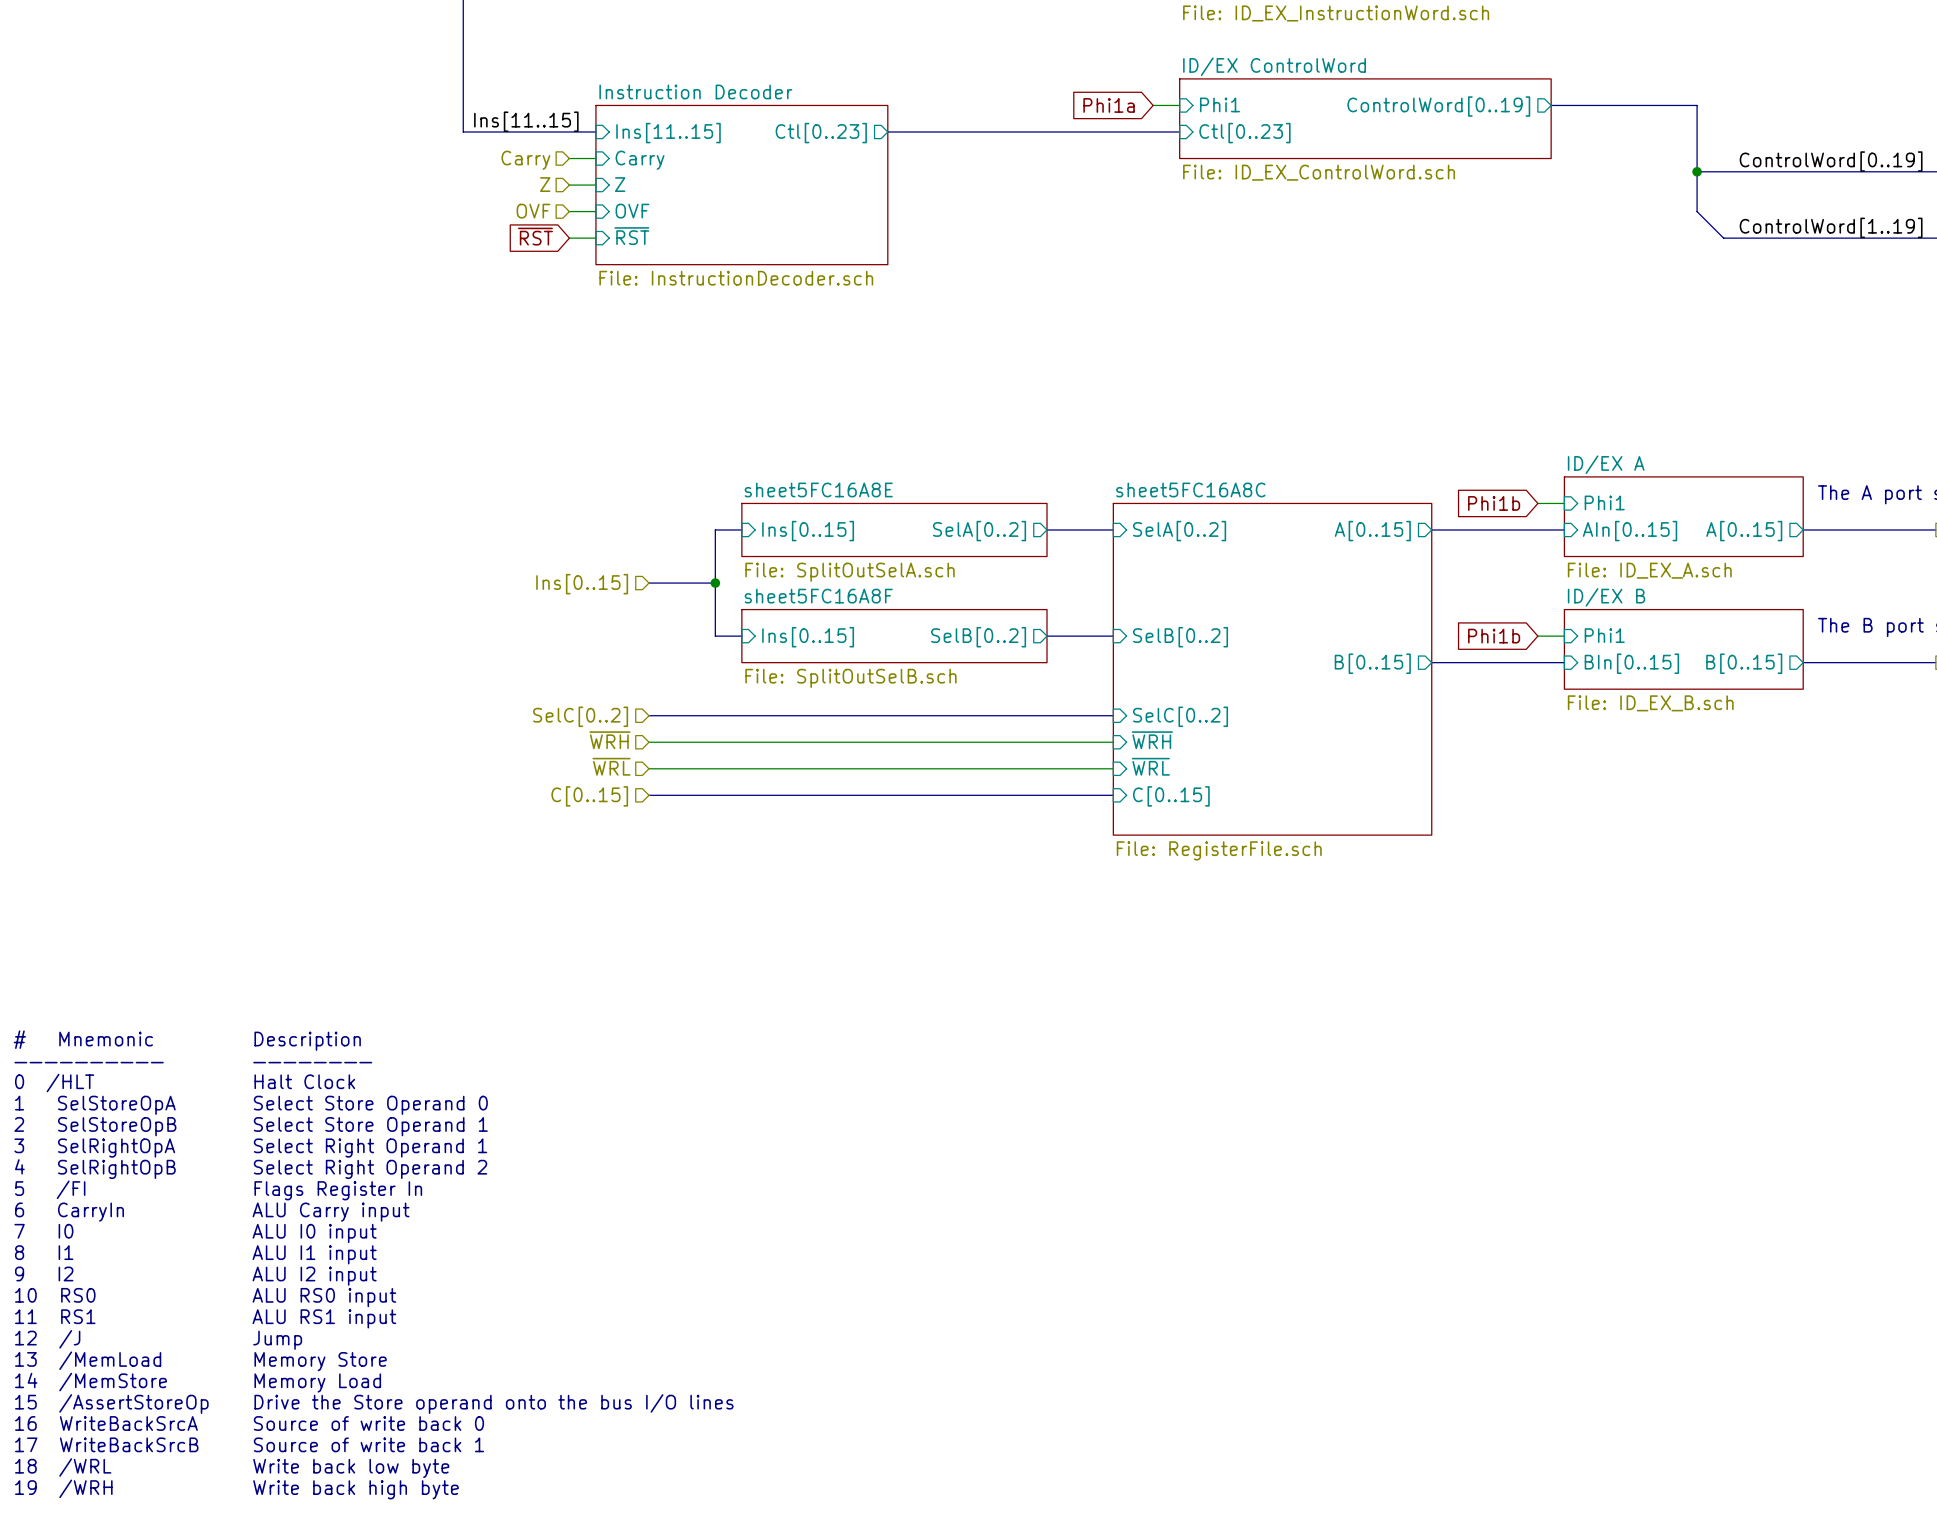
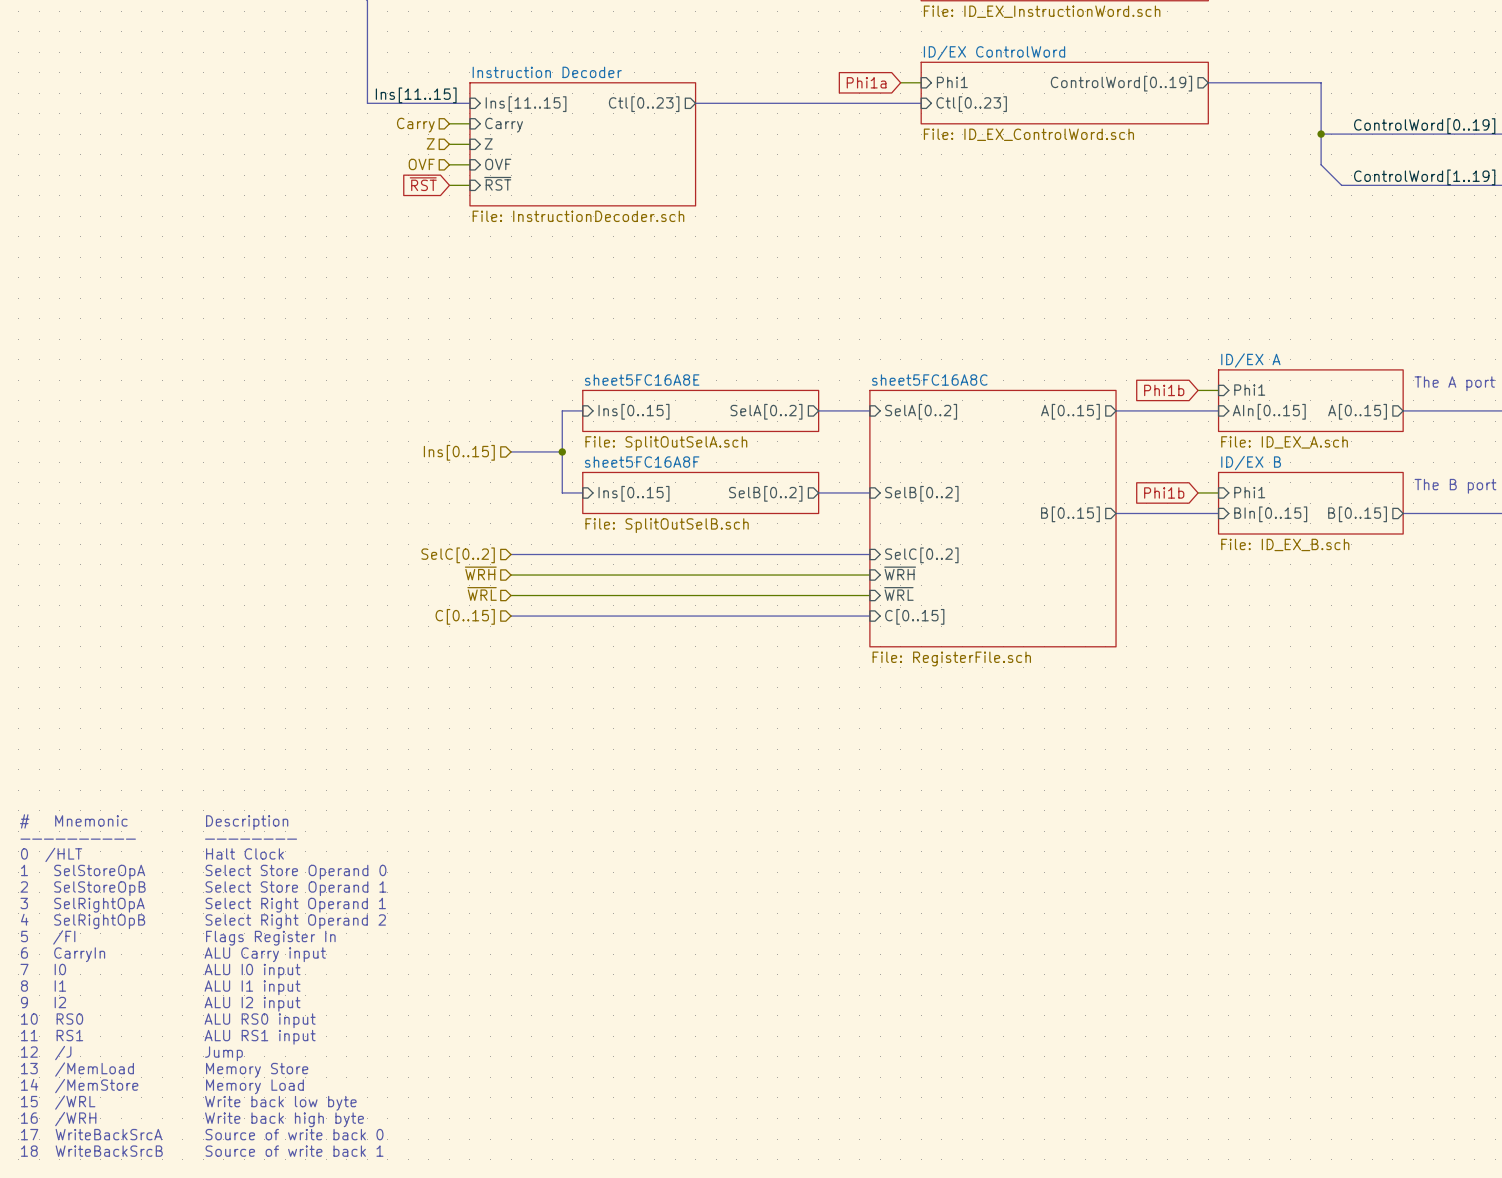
text: # Mnemonic (83, 1039) -> none
text: Description (307, 1041) -> none
text: —————————— (89, 1062) -> # Mnemonic (73, 821)
text: ———————— (312, 1062) -> Description (247, 822)
text: Halt Clock (304, 1081) -> ———————— (251, 839)
text: 0 /HLT (54, 1083) -> —————————— (78, 839)
text: 1 SelStoreOpA (95, 1105) -> 0 /HLT (51, 854)
text: Select Store Operand 0 (370, 1105) -> Halt Clock (244, 853)
text: 2 SelStoreOpB (95, 1126) -> 1 SelStoreOpA (83, 872)
text: Select Store Operand 1 (370, 1126) -> Select Store Operand 0 (295, 872)
text: 3 SelRightOpA (94, 1148) -> 2 SelStoreOpB (83, 888)
text: Select Right Operand 1 (370, 1148) -> Select Store Operand 1 (295, 888)
text: 4 SelRightOpB (95, 1169) -> 3 SelRightOpA (82, 905)
text: Select Right Operand 2 (370, 1169) -> Select Right Operand 1 (295, 905)
text: 5 /FI (50, 1189) -> 4 SelRightOpB (83, 921)
text: Flags Register In (338, 1190) -> Select Right Operand 2 (295, 921)
text: 6 CarryIn (69, 1212) -> 5 /FI (48, 937)
text: ALU Carry input (331, 1212) -> Flags Register In (270, 938)
text: 7 I0 (43, 1231) -> 6 CarryIn (63, 954)
text: ALU I0 input (314, 1233) -> ALU Carry input (265, 954)
text: 8 I1 (44, 1252) -> 7 I0 (43, 969)
text: ALU I1 input (314, 1254) -> ALU I0 input (252, 971)
text: 9 I2 (44, 1273) -> 8 I1 (43, 986)
text: ALU I2 input (314, 1276) -> ALU I1 input (252, 987)
text: 10 RS0 (55, 1295) -> 9 I2 (43, 1002)
text: ALU RS0 input (324, 1297) -> ALU I2 input (252, 1004)
text: 11 RS1 (55, 1316) -> 10 RS0 (52, 1019)
text: ALU RS1 input (324, 1318) -> ALU RS0 input (260, 1020)
text: 12 /J (47, 1339) -> 11 RS1 (52, 1035)
text: Jump (277, 1340) -> ALU RS1 input (260, 1037)
text: 13 /MemLoad (88, 1360) -> 12 /J (46, 1053)
text: Memory Store (320, 1361) -> Jump (223, 1053)
text: 14 /MemStore (90, 1382) -> 13 /MemLoad (77, 1069)
text: Memory Load (317, 1382) -> Memory Store (257, 1070)
text: 15 /AssertStoreOp (111, 1404) -> 14 /MemStore (79, 1086)
text: Drive the Store operand onto the bus I/O lines (494, 1404) -> Memory Load (254, 1086)
text: 16 WriteBackSrcA (106, 1423) -> 15 /WRL (58, 1102)
text: Source of write back 0 (368, 1423) -> Write back low byte (280, 1103)
text: 17 WriteBackSrcB (106, 1444) -> 16 /WRH (58, 1119)
text: Source of write back 1 (368, 1444) -> Write back high byte (284, 1119)
text: 18 /WRL (63, 1467) -> 17 WriteBackSrcA (91, 1134)
text: Write back low byte (351, 1468) -> Source of write back 0 (294, 1134)
text: 19 /WRH (63, 1488) -> 18 WriteBackSrcB (91, 1151)
text: Write back high byte (355, 1489) -> Source of write back 1 (294, 1151)

